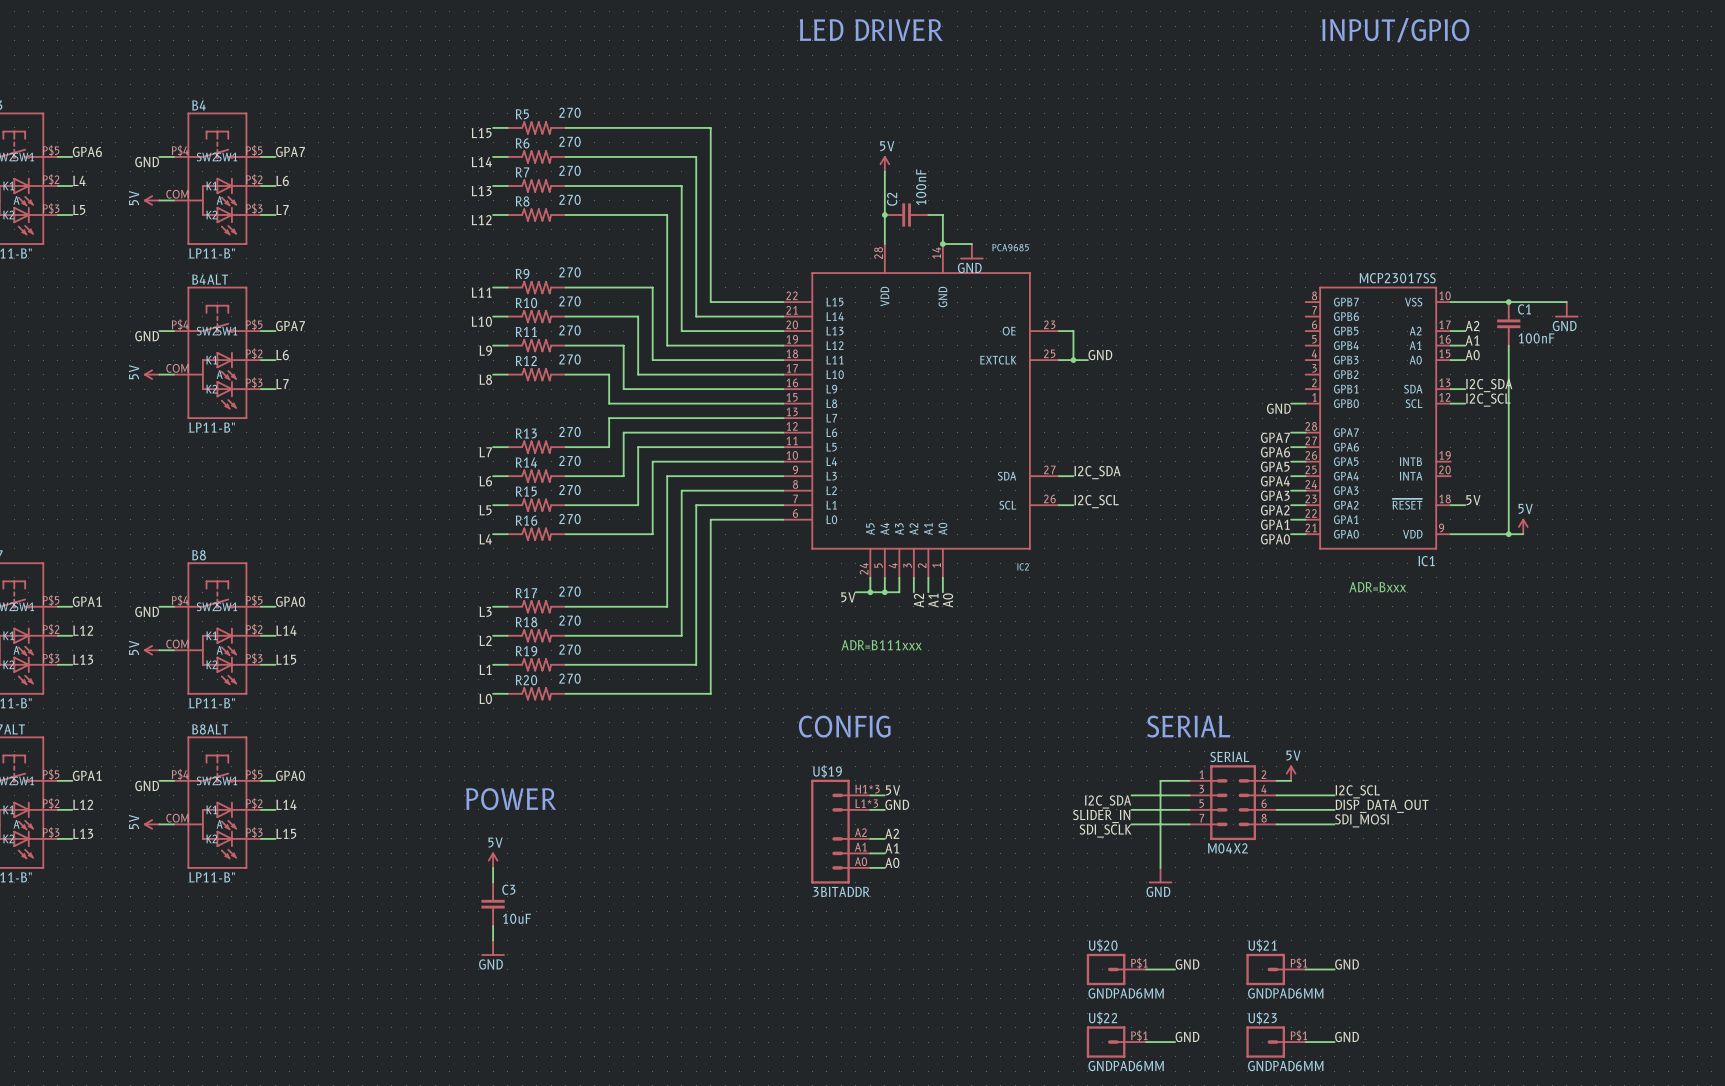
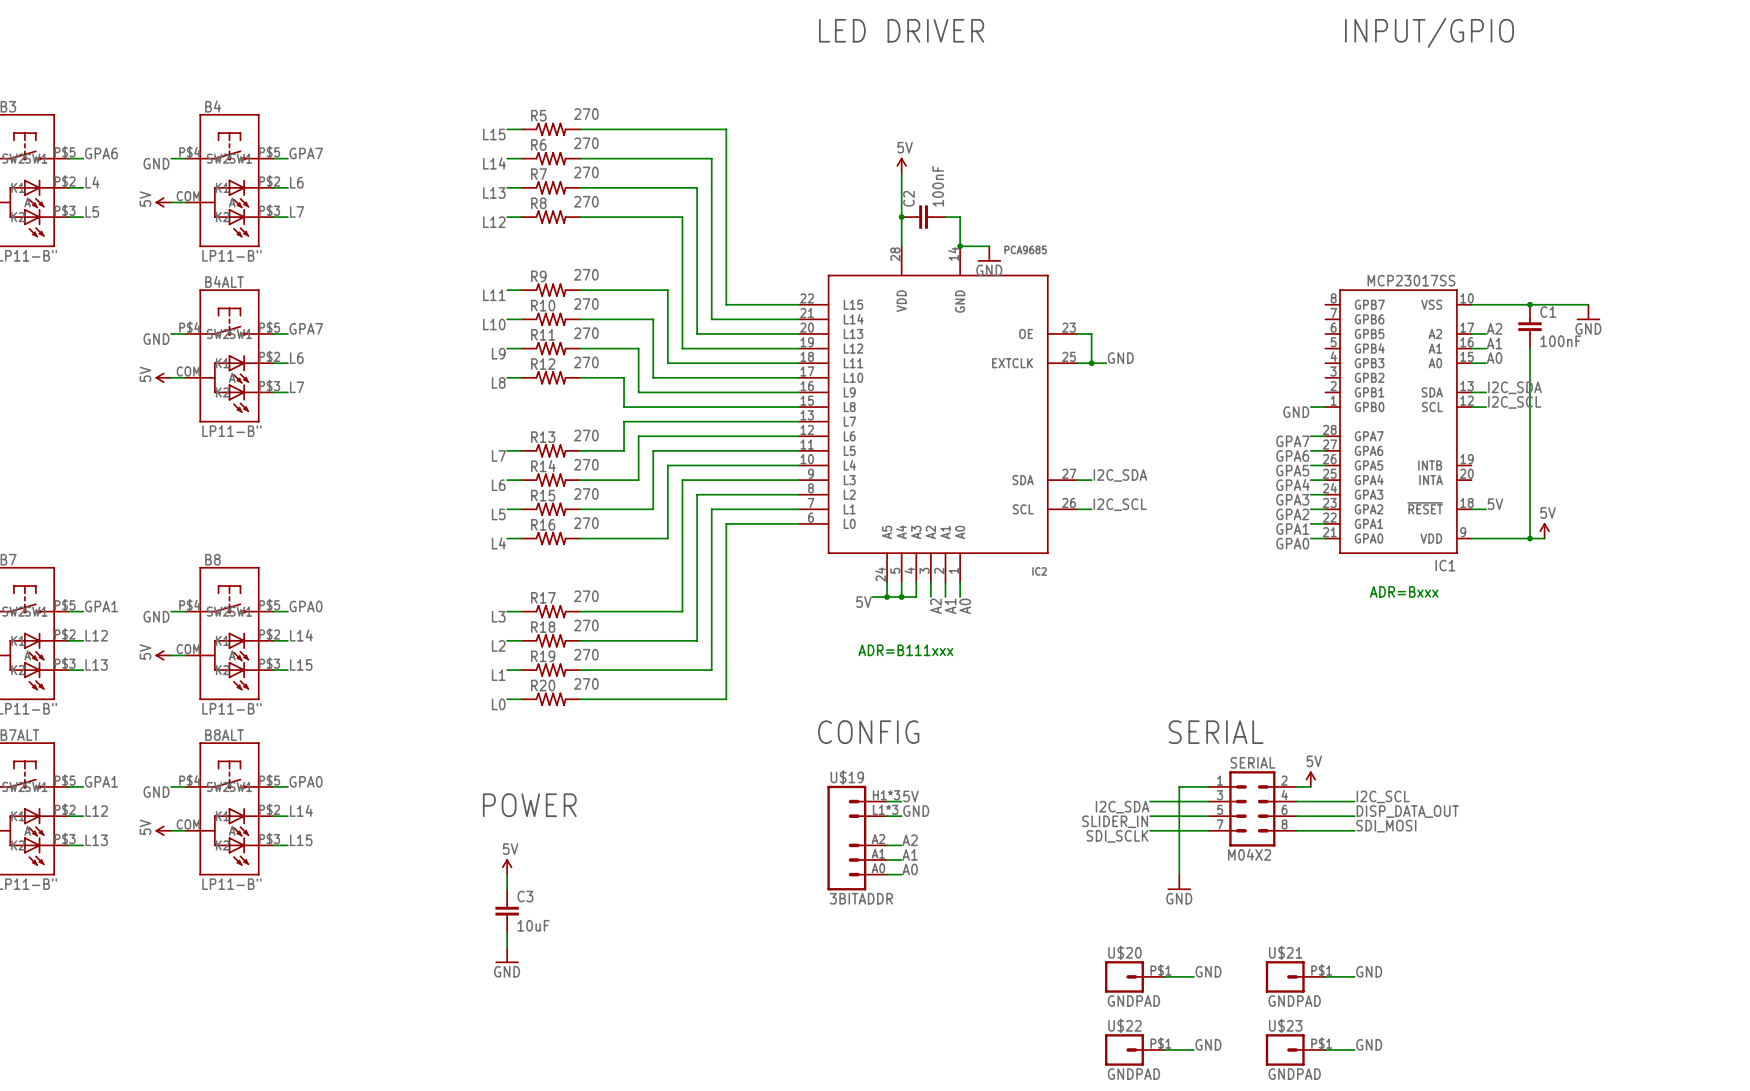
U$20 value: GNDPAD6MM (1126, 993) -> GNDPAD (1133, 1001)
U$21 value: GNDPAD6MM (1285, 993) -> GNDPAD (1294, 1001)
U$22 value: GNDPAD6MM (1126, 1066) -> GNDPAD (1133, 1074)
U$23 value: GNDPAD6MM (1285, 1066) -> GNDPAD (1294, 1074)

